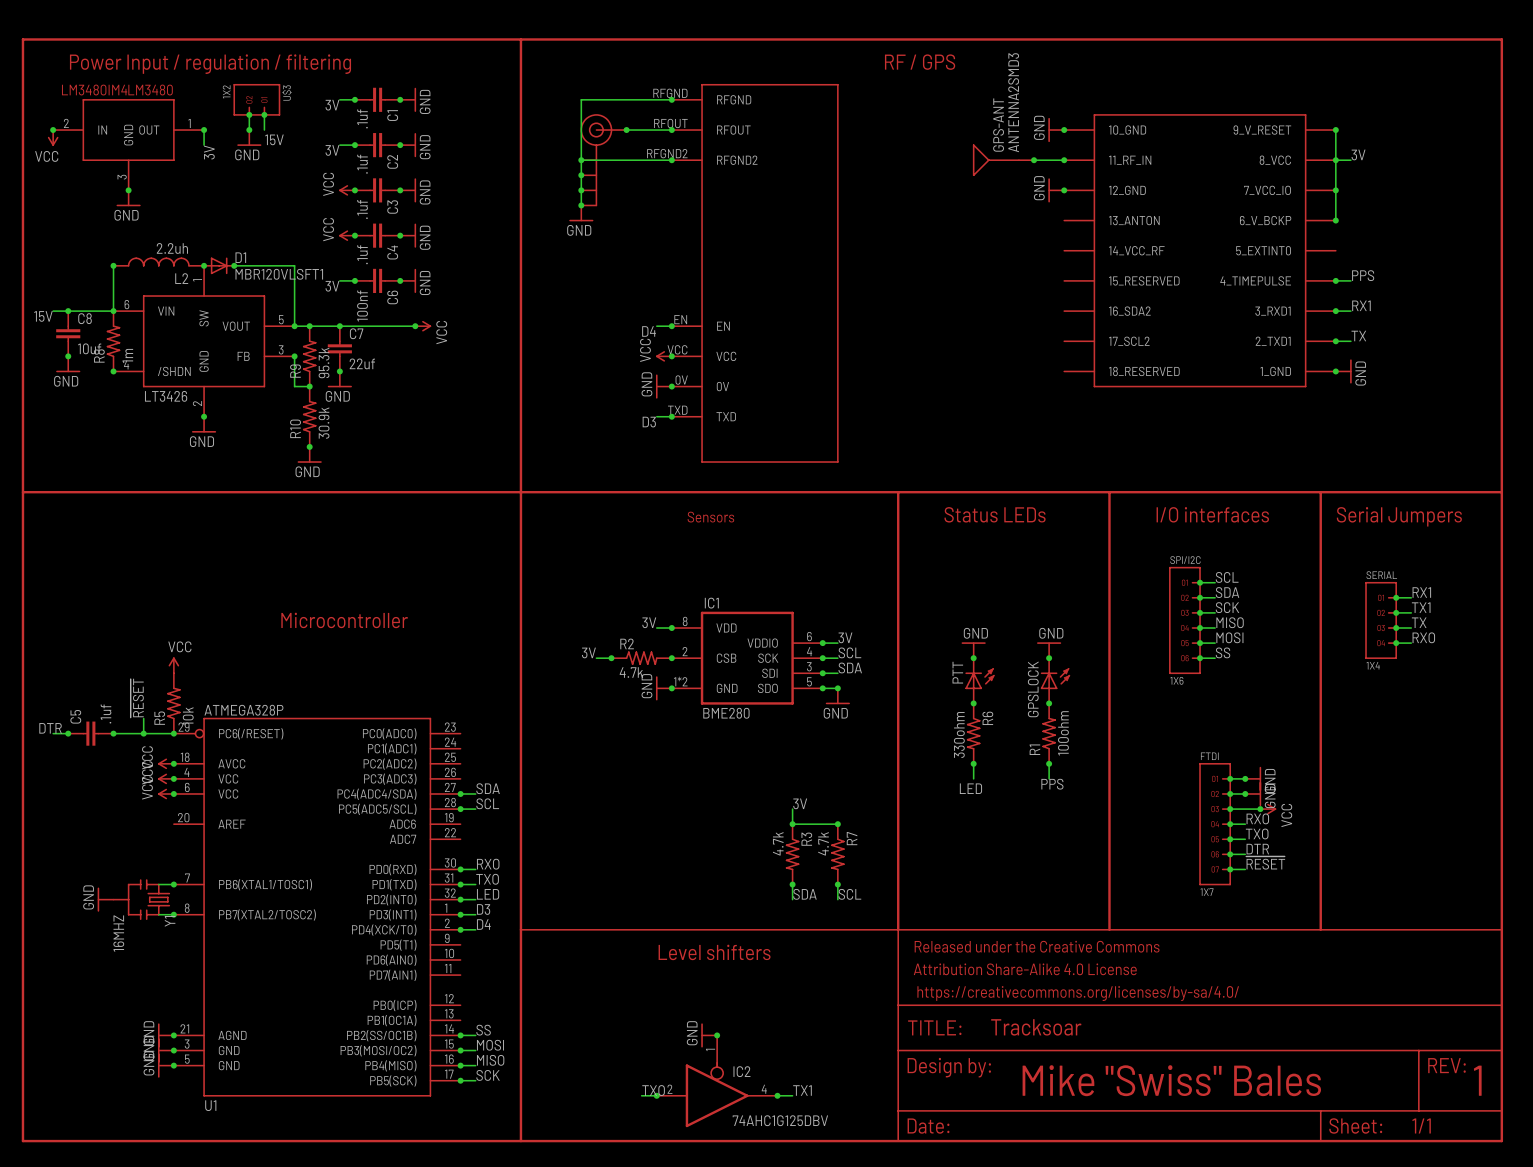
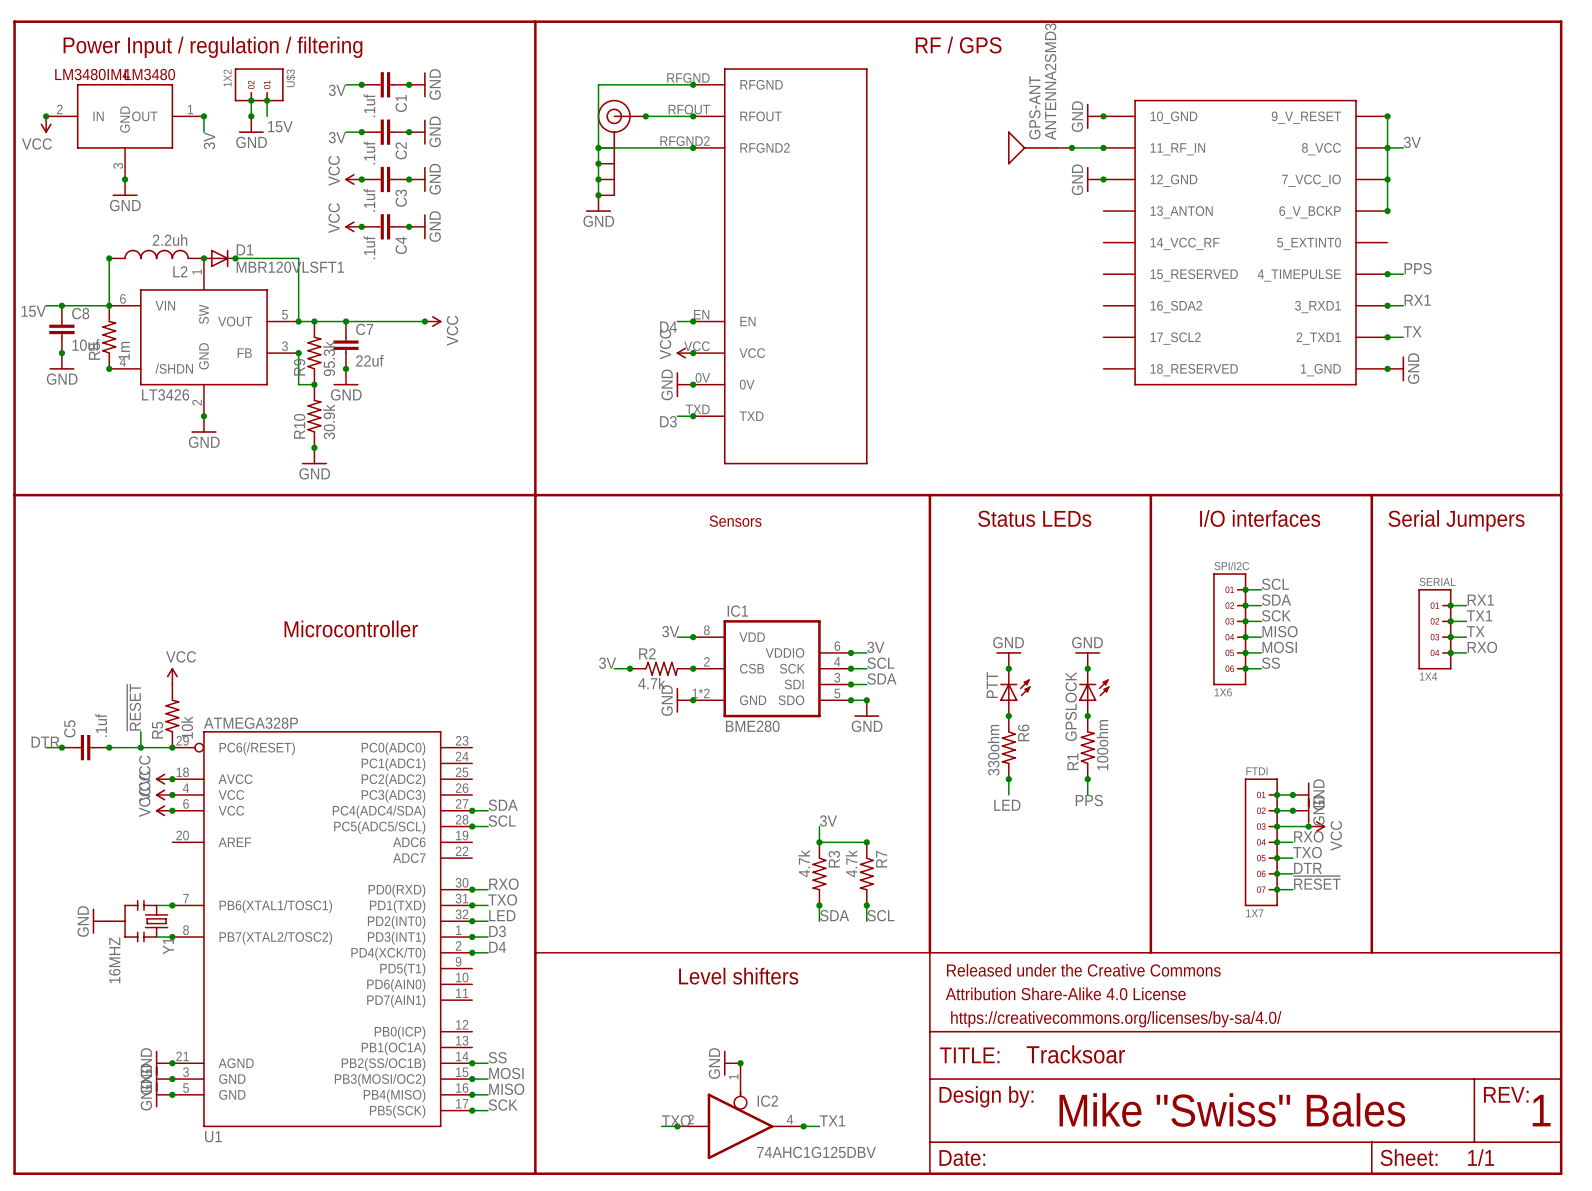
wire: (339, 280) (354, 280) -> none
junction: (354, 280) -> none
C6: 100nf (377, 280) -> none
junction: (400, 280) -> none
power symbol: GND (408, 280) -> none
label: 3V (332, 286) -> none

